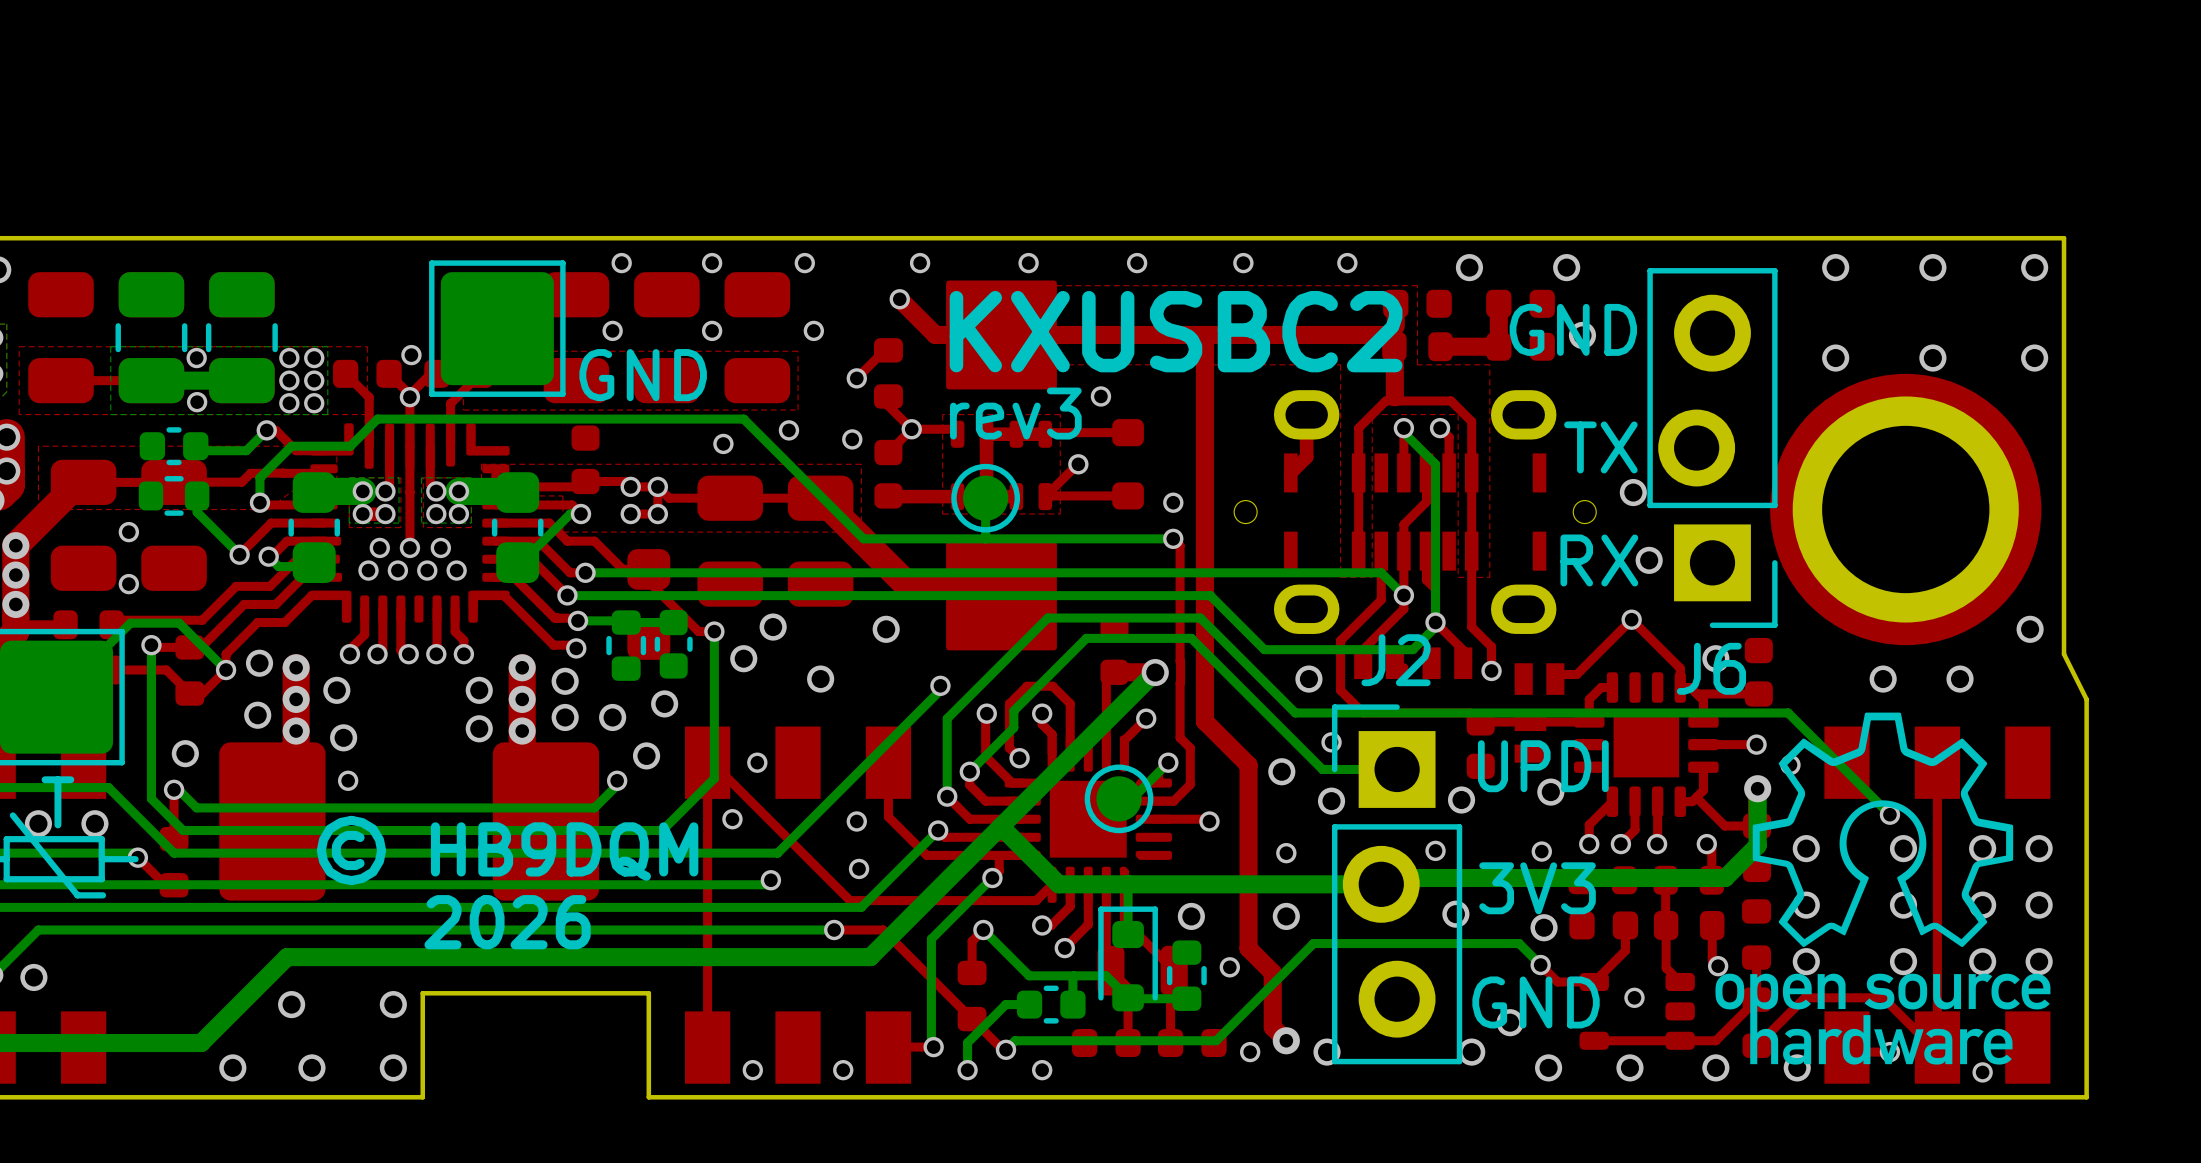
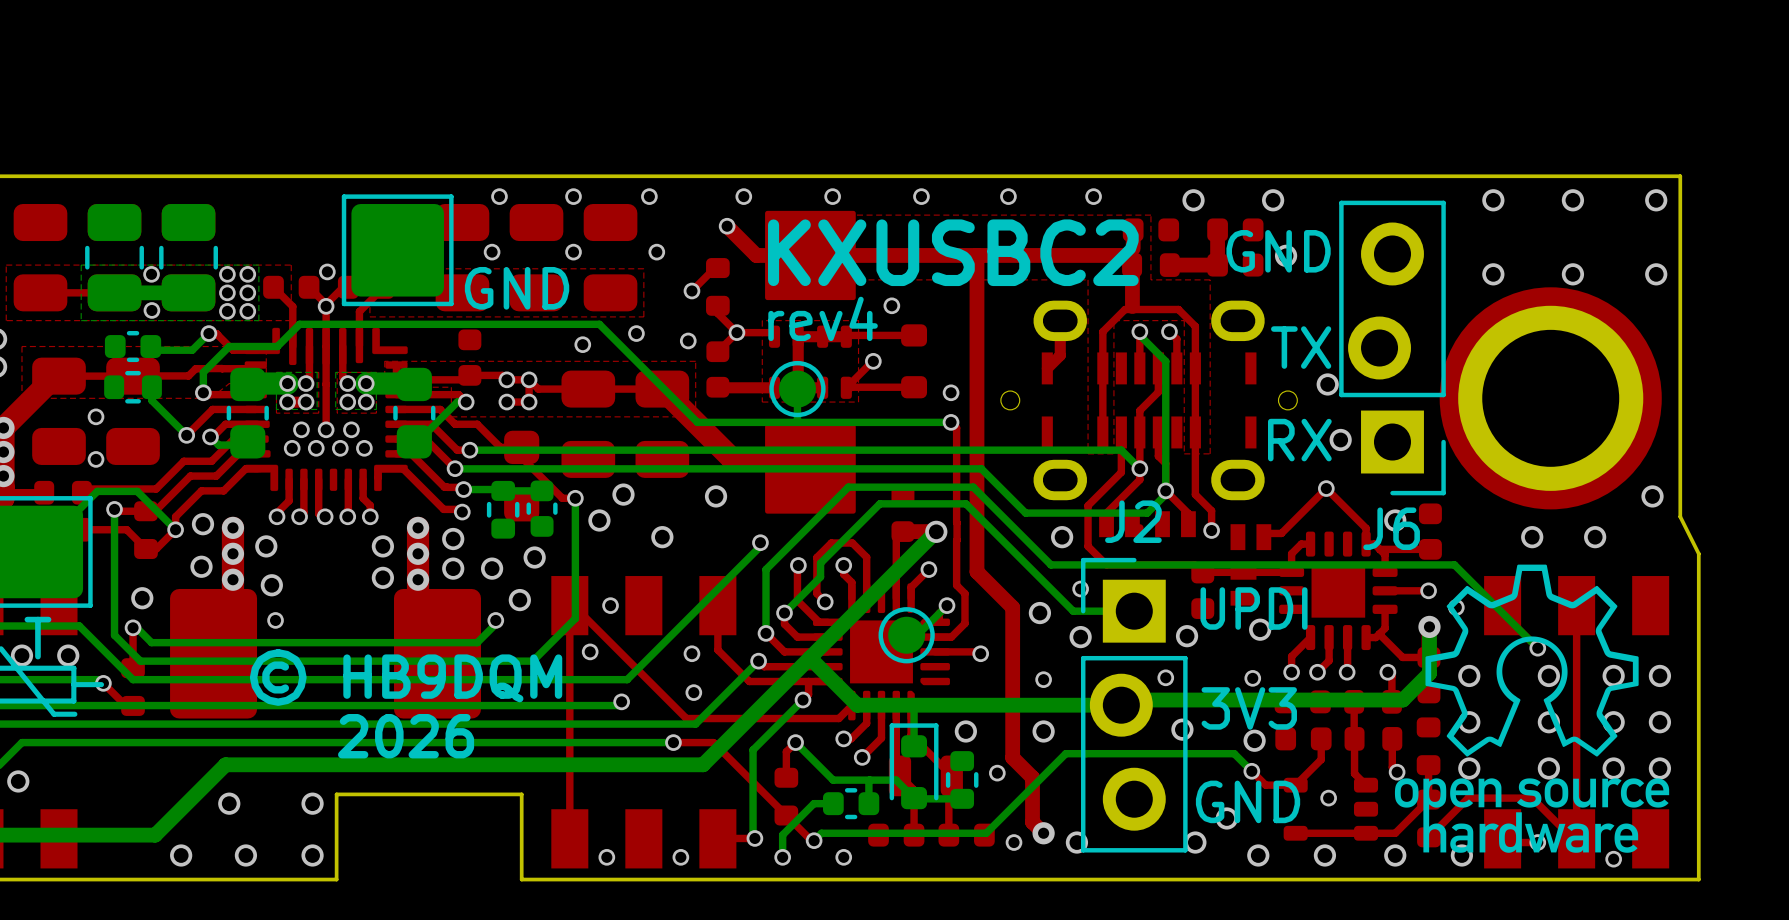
text: rev3 (1015, 413) -> rev4 (823, 318)

